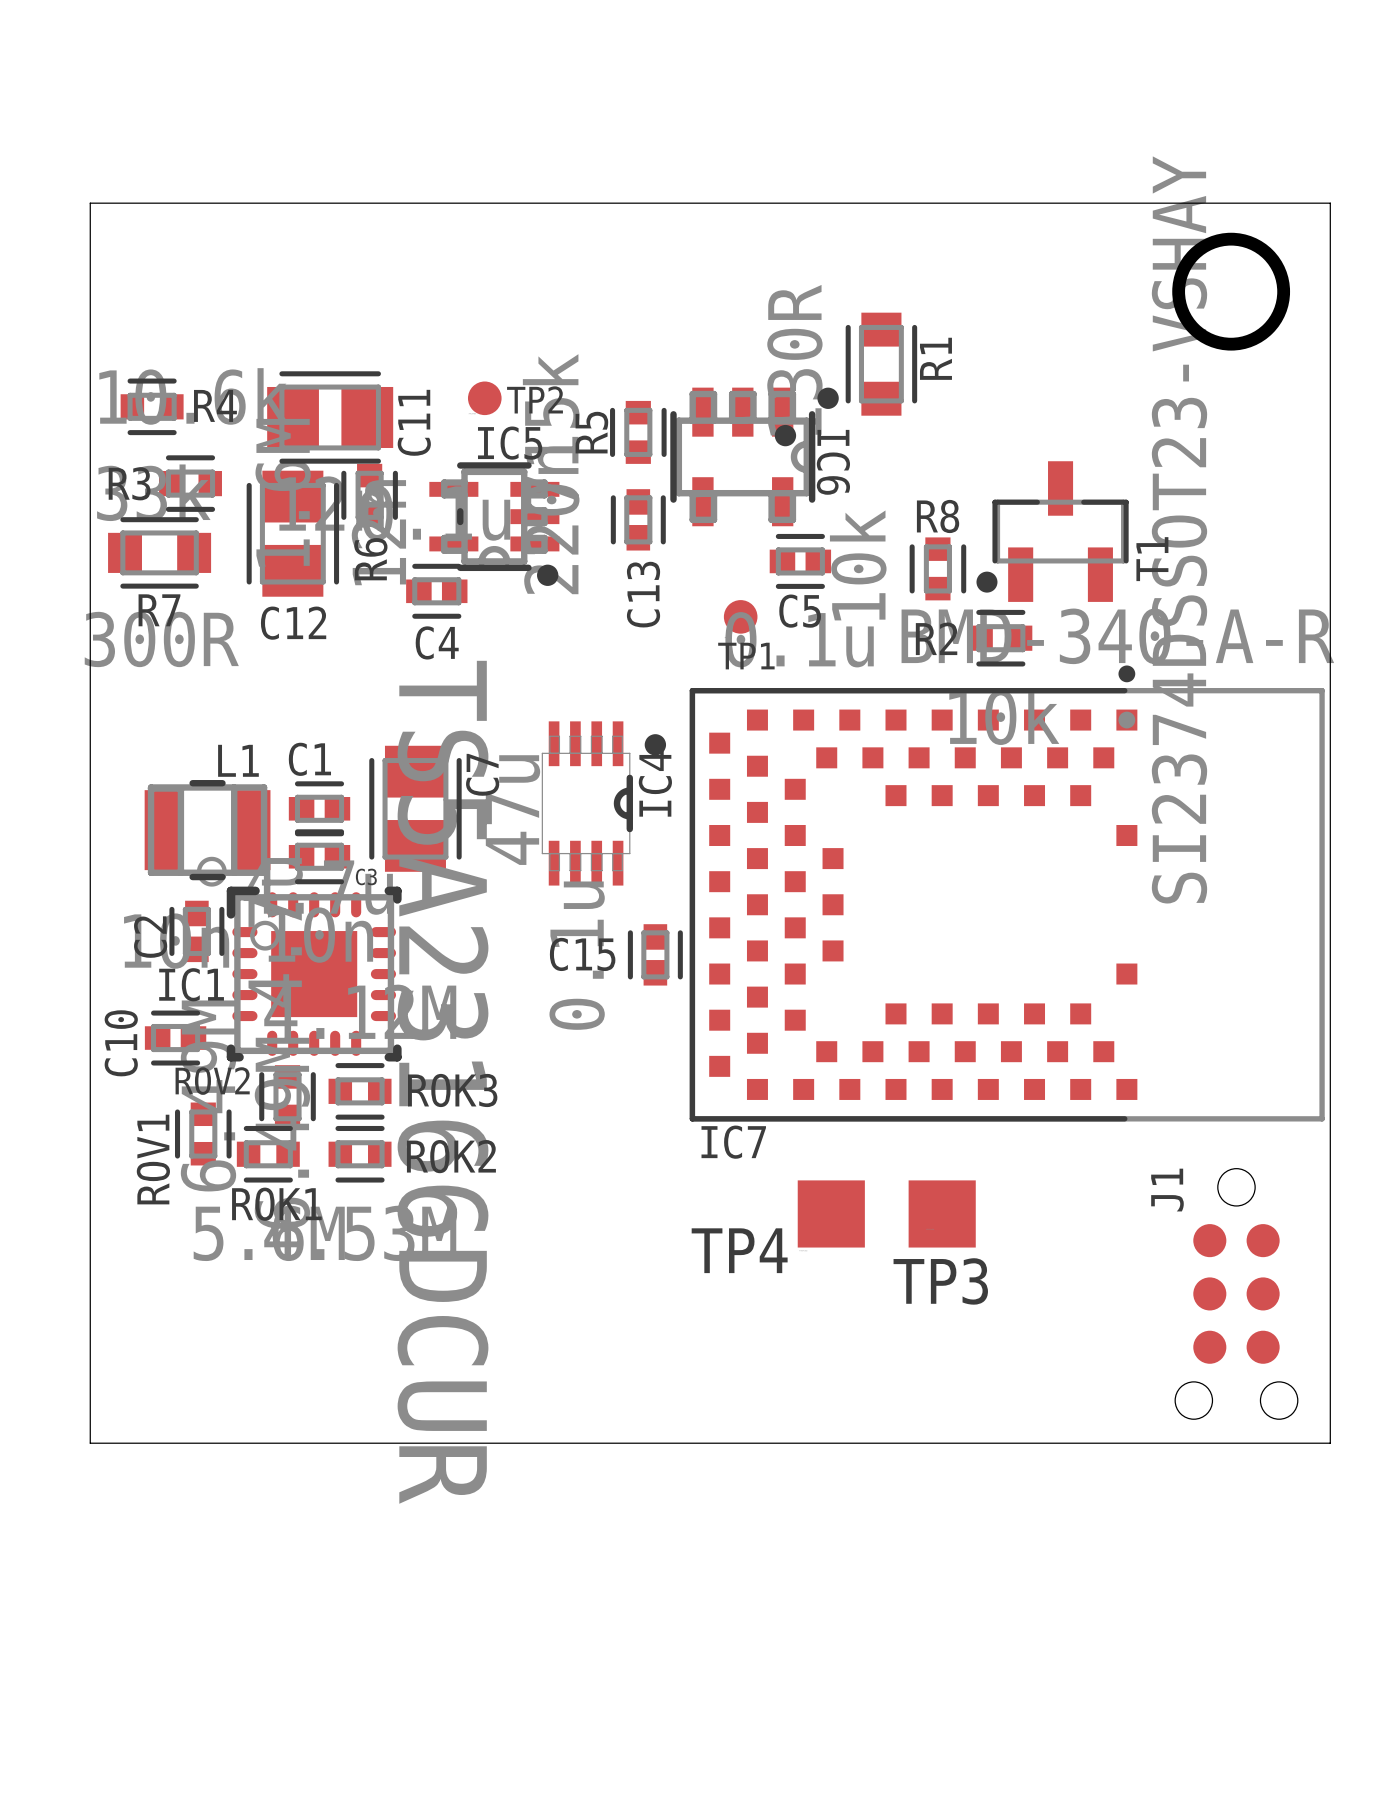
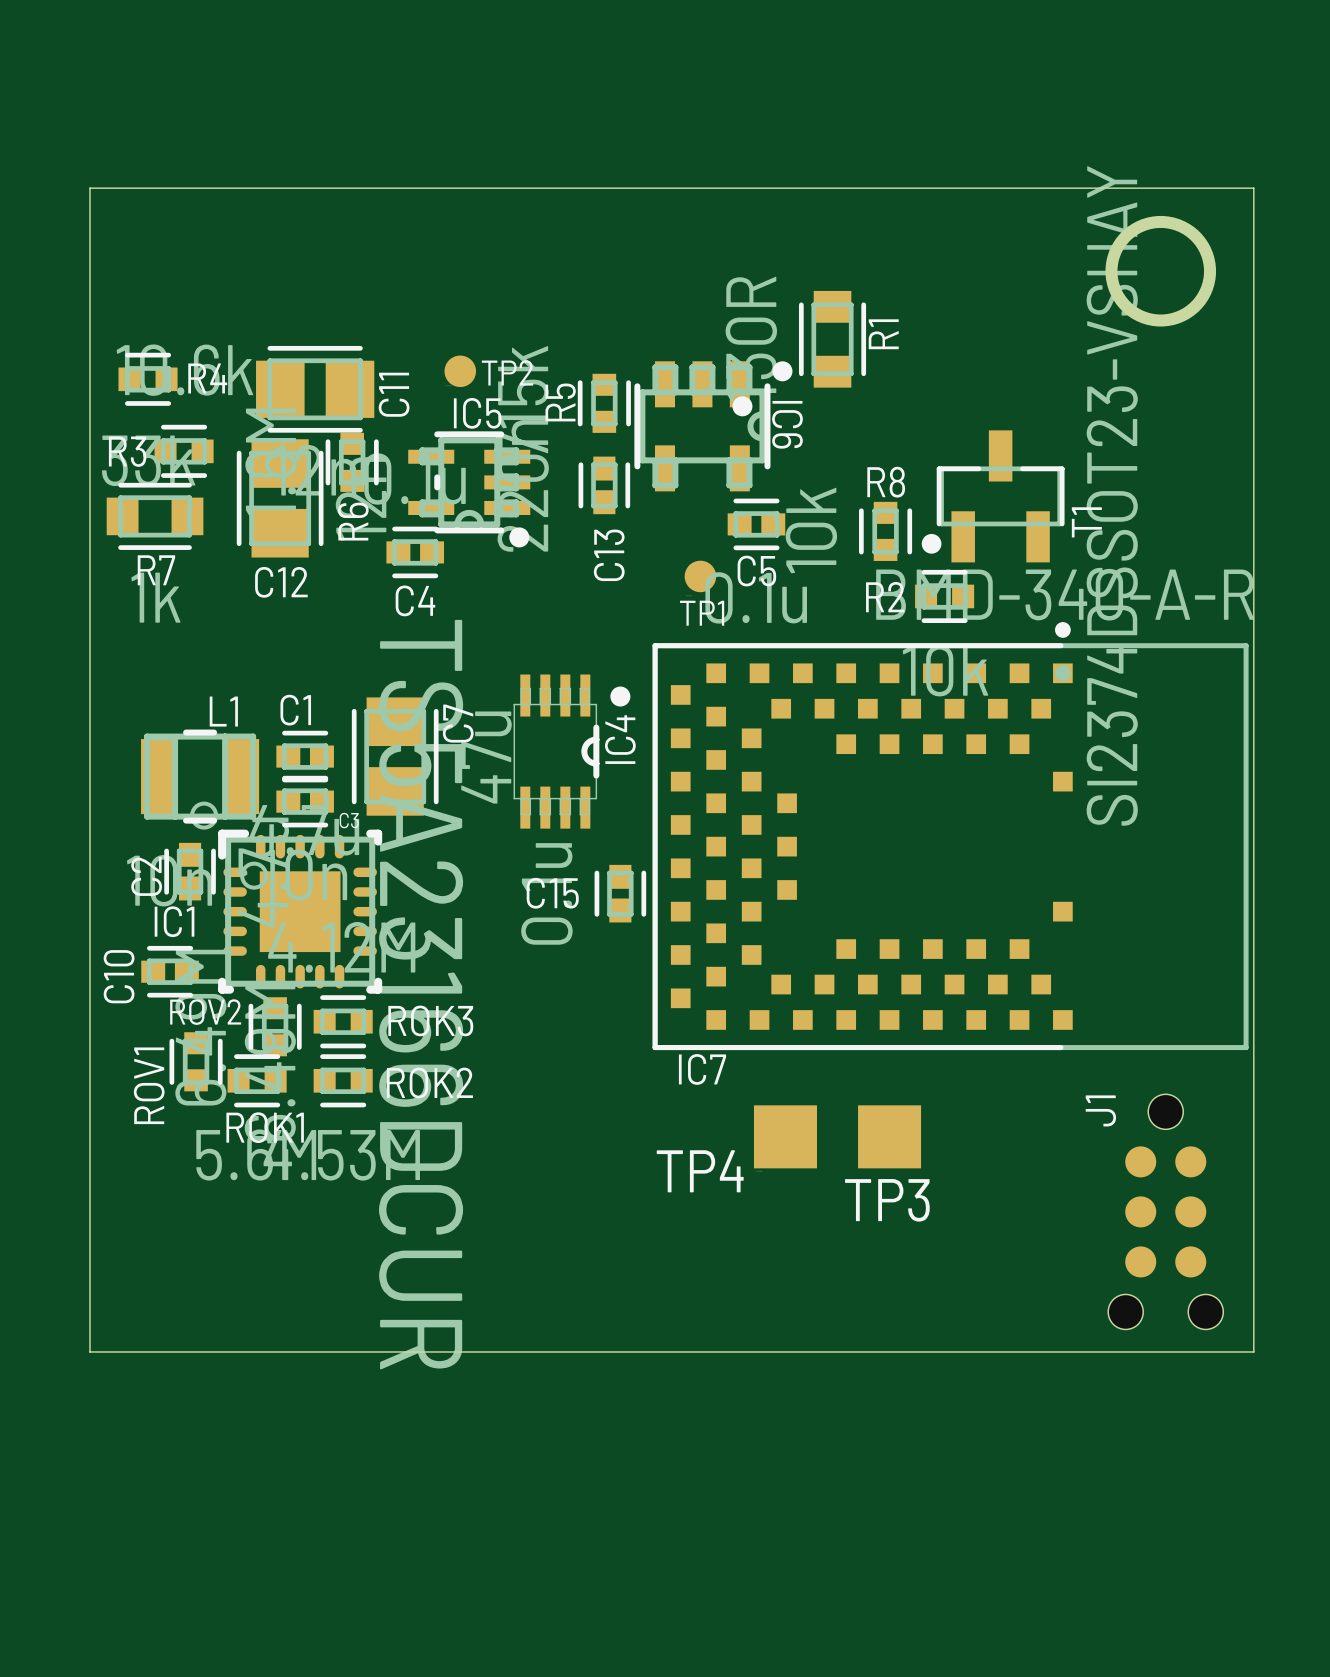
R7 value: 300R (161, 639) -> 1k (155, 597)

